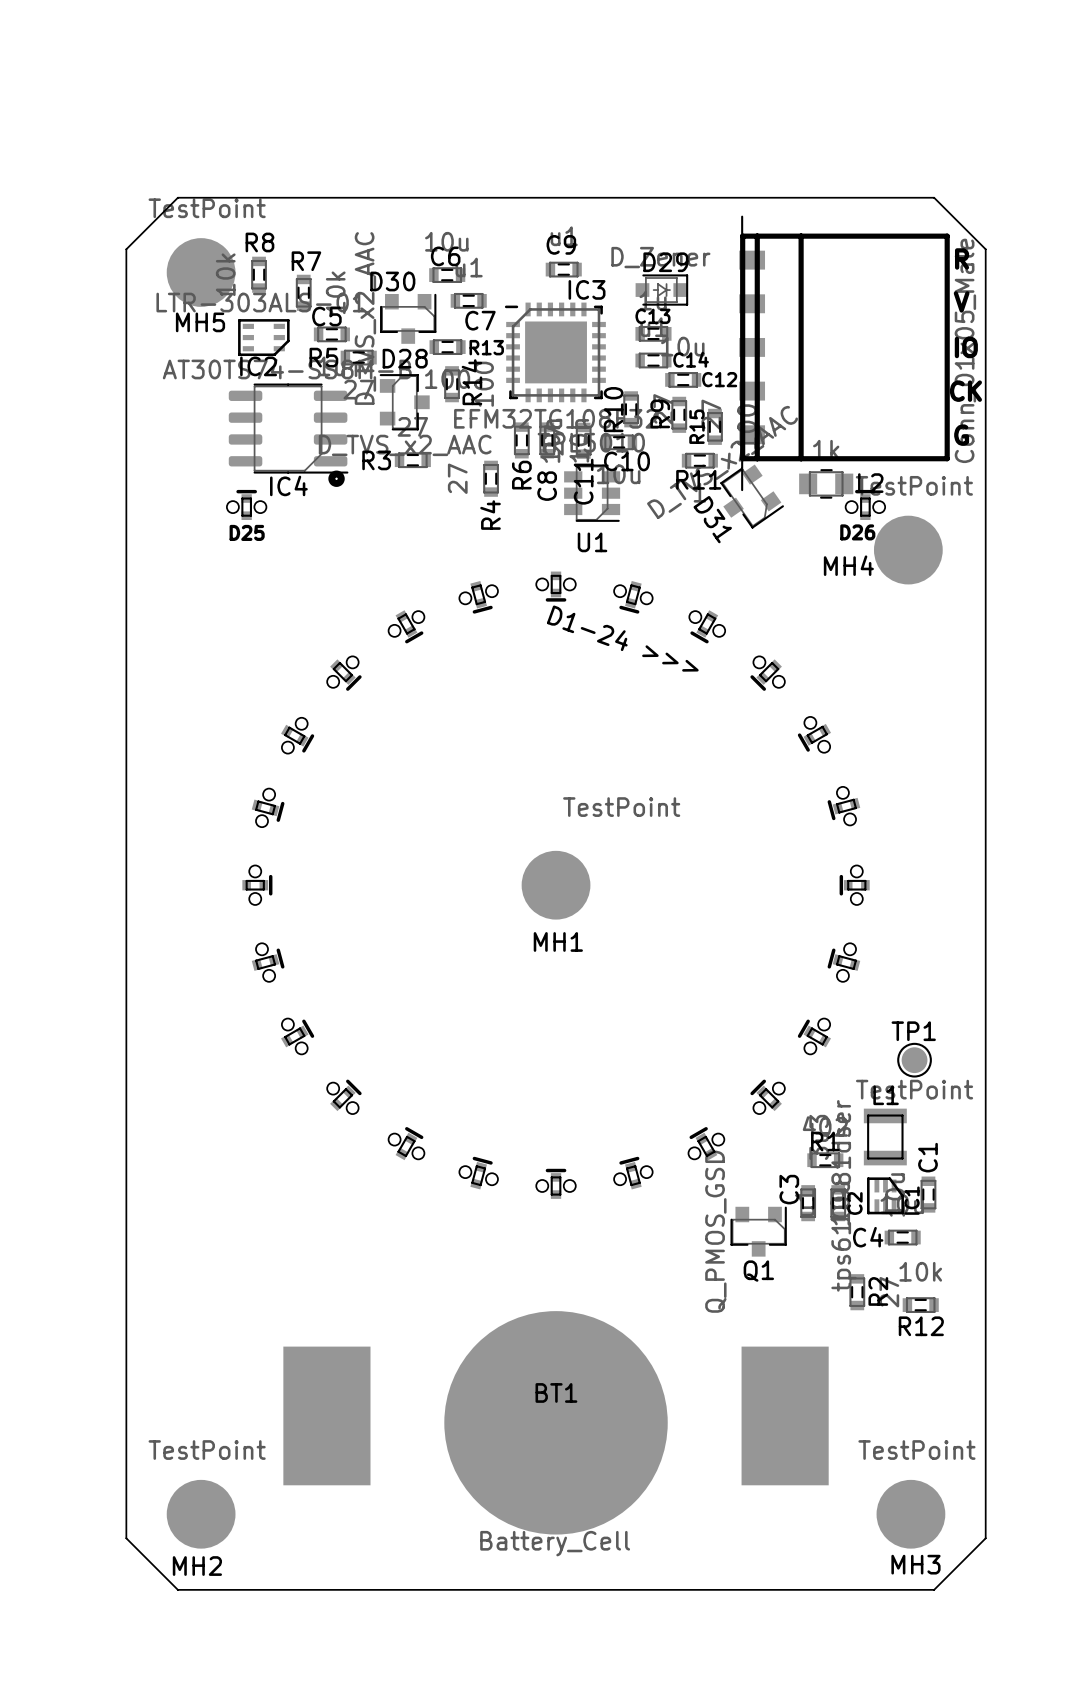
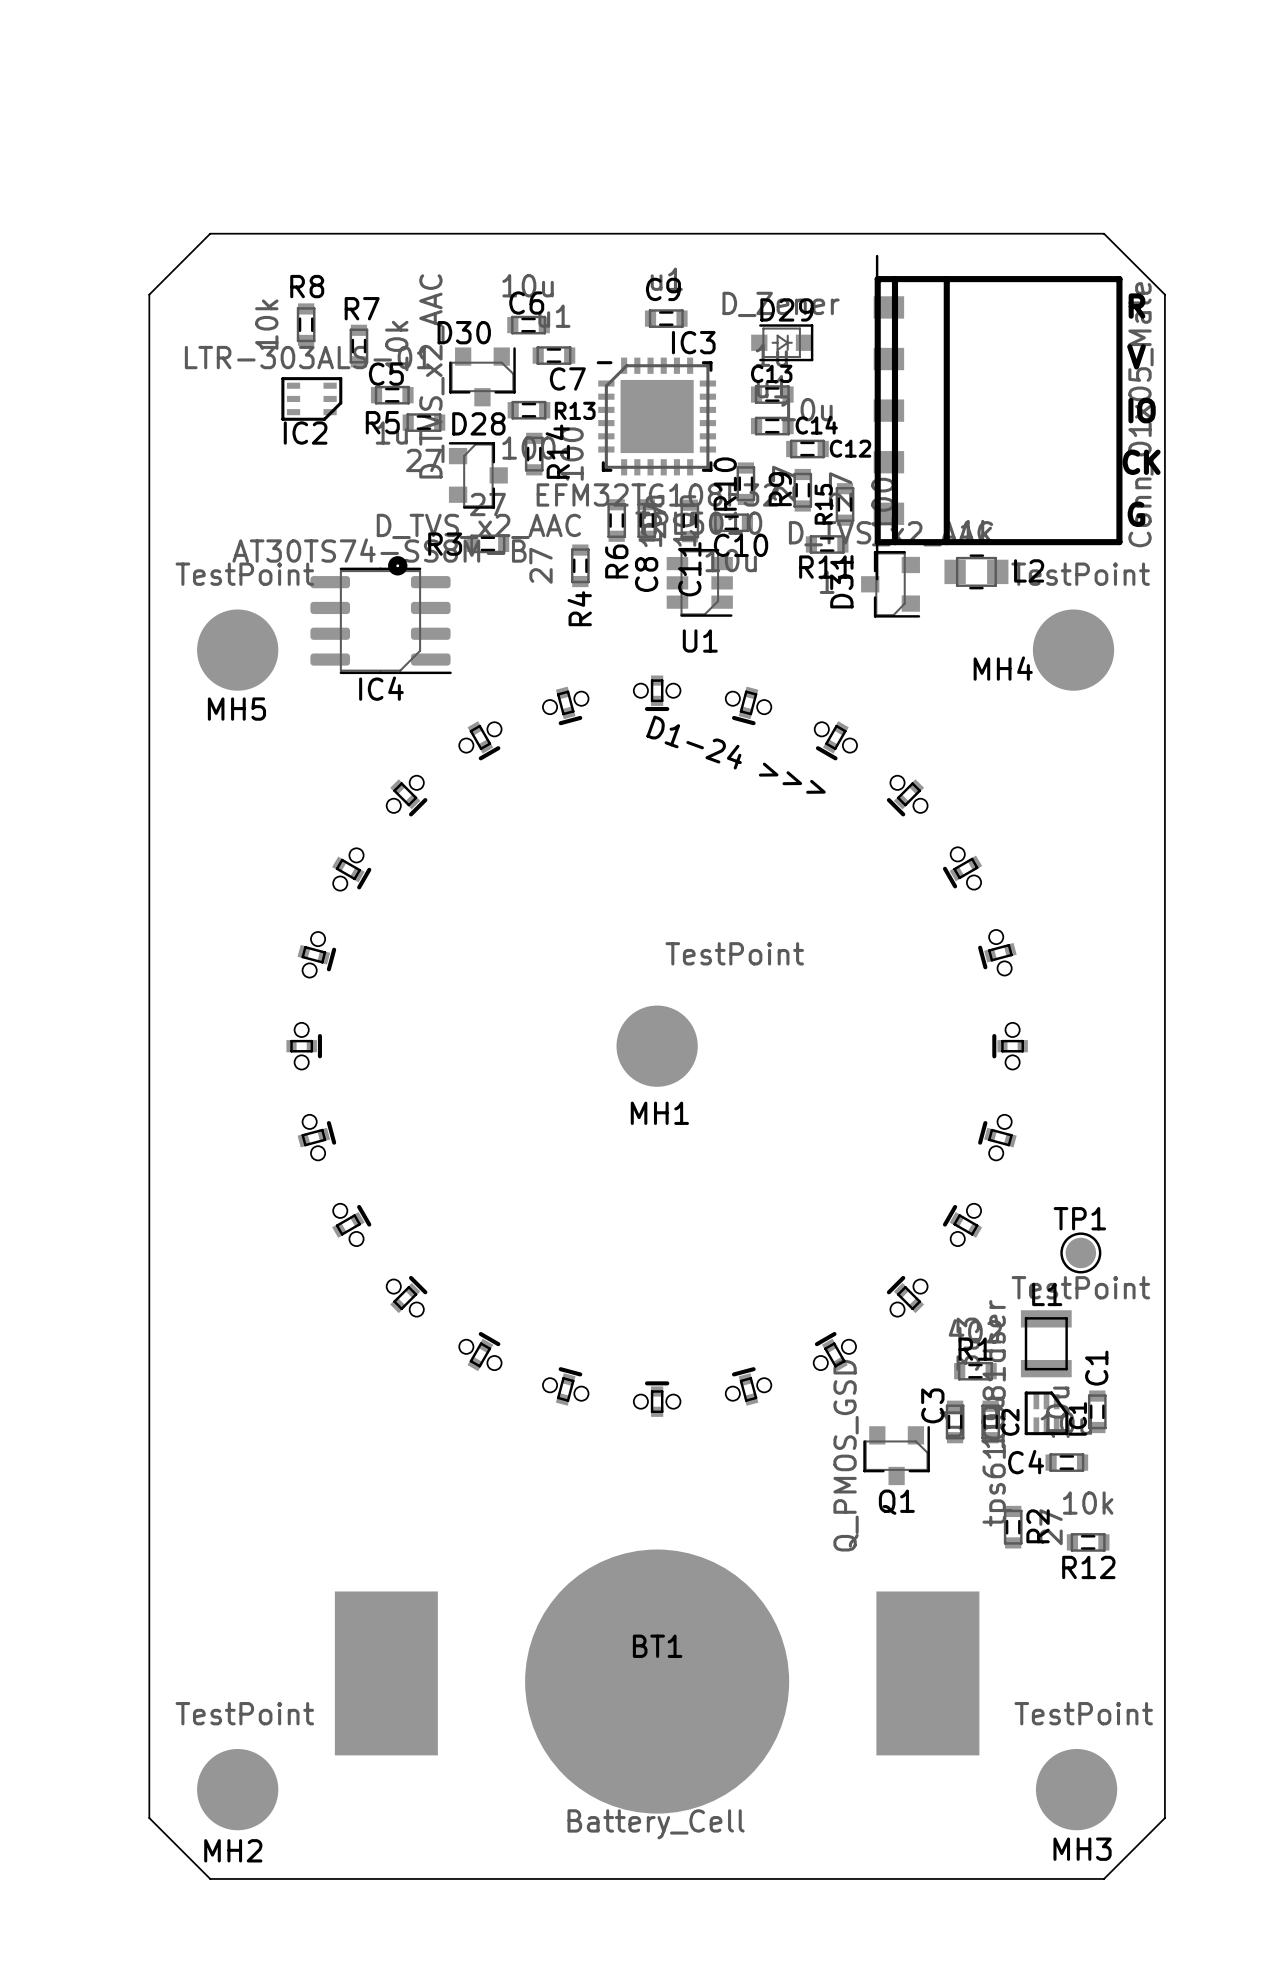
MH5 position: (201, 272) -> (237, 650)
IC4 position: (288, 428) -> (381, 620)
D31 rotation: 0° (752, 496) -> 35° clockwise (890, 584)
D25: (246, 504) -> none
D26: (865, 504) -> none

